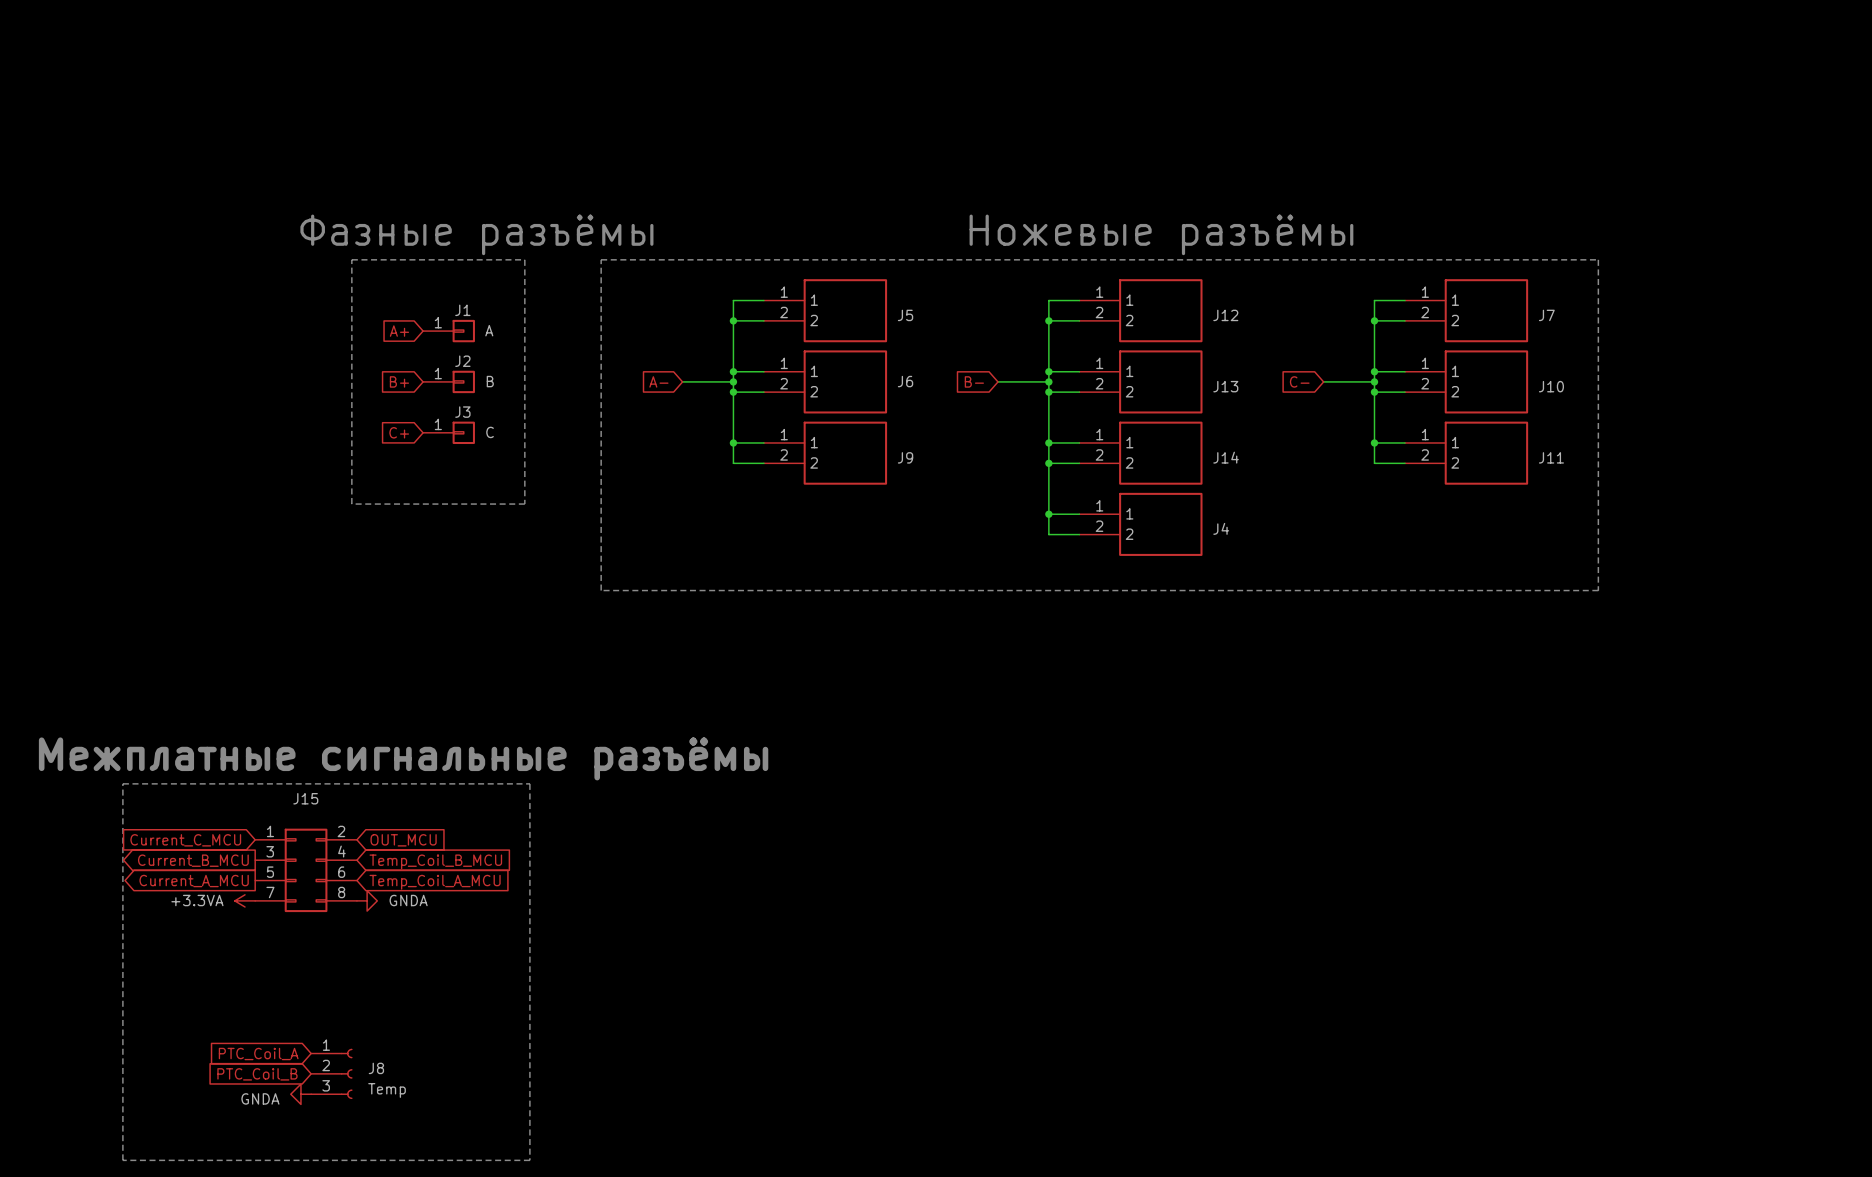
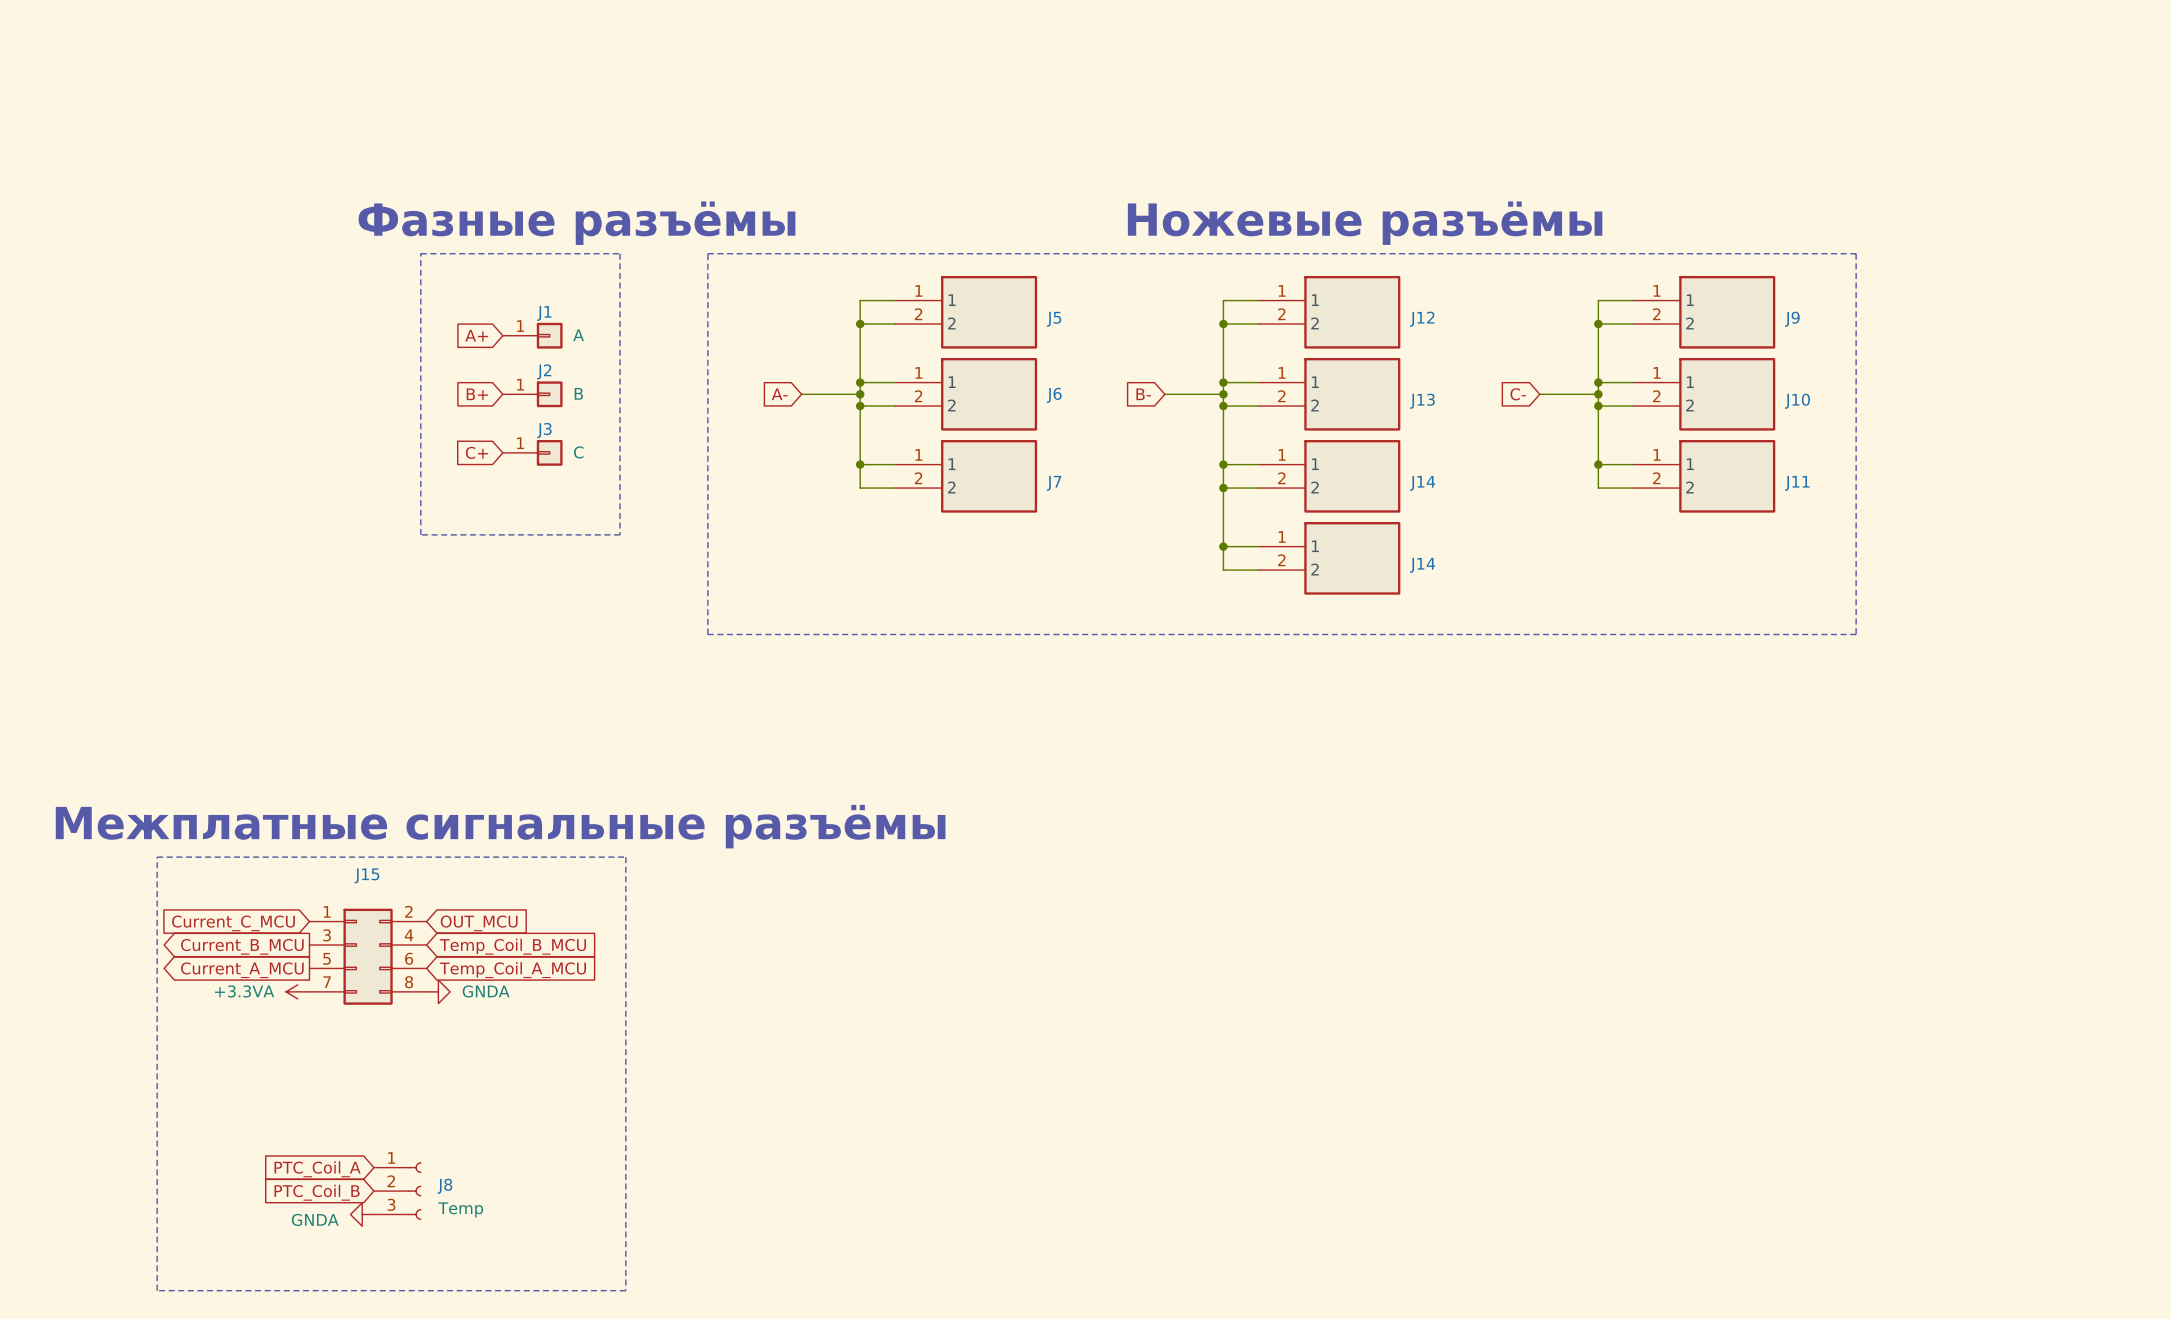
J7 name: J7 (1546, 315) -> J9 (1792, 319)
J9 name: J9 (905, 457) -> J7 (1054, 483)
J4 name: J4 (1221, 528) -> J14 (1422, 565)

